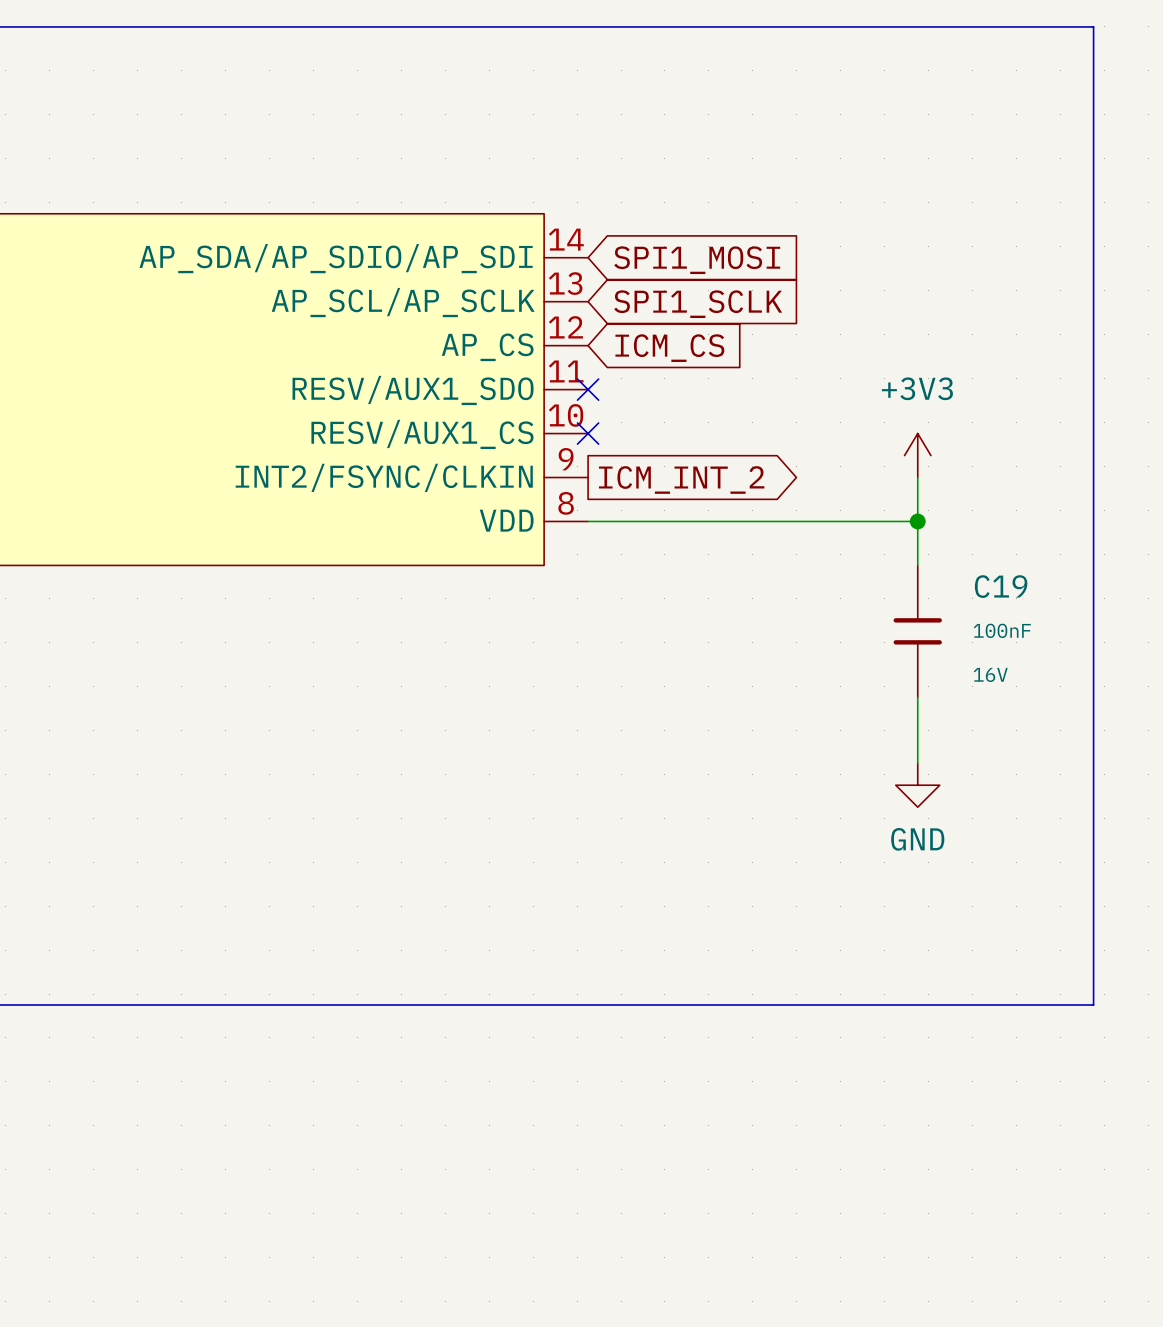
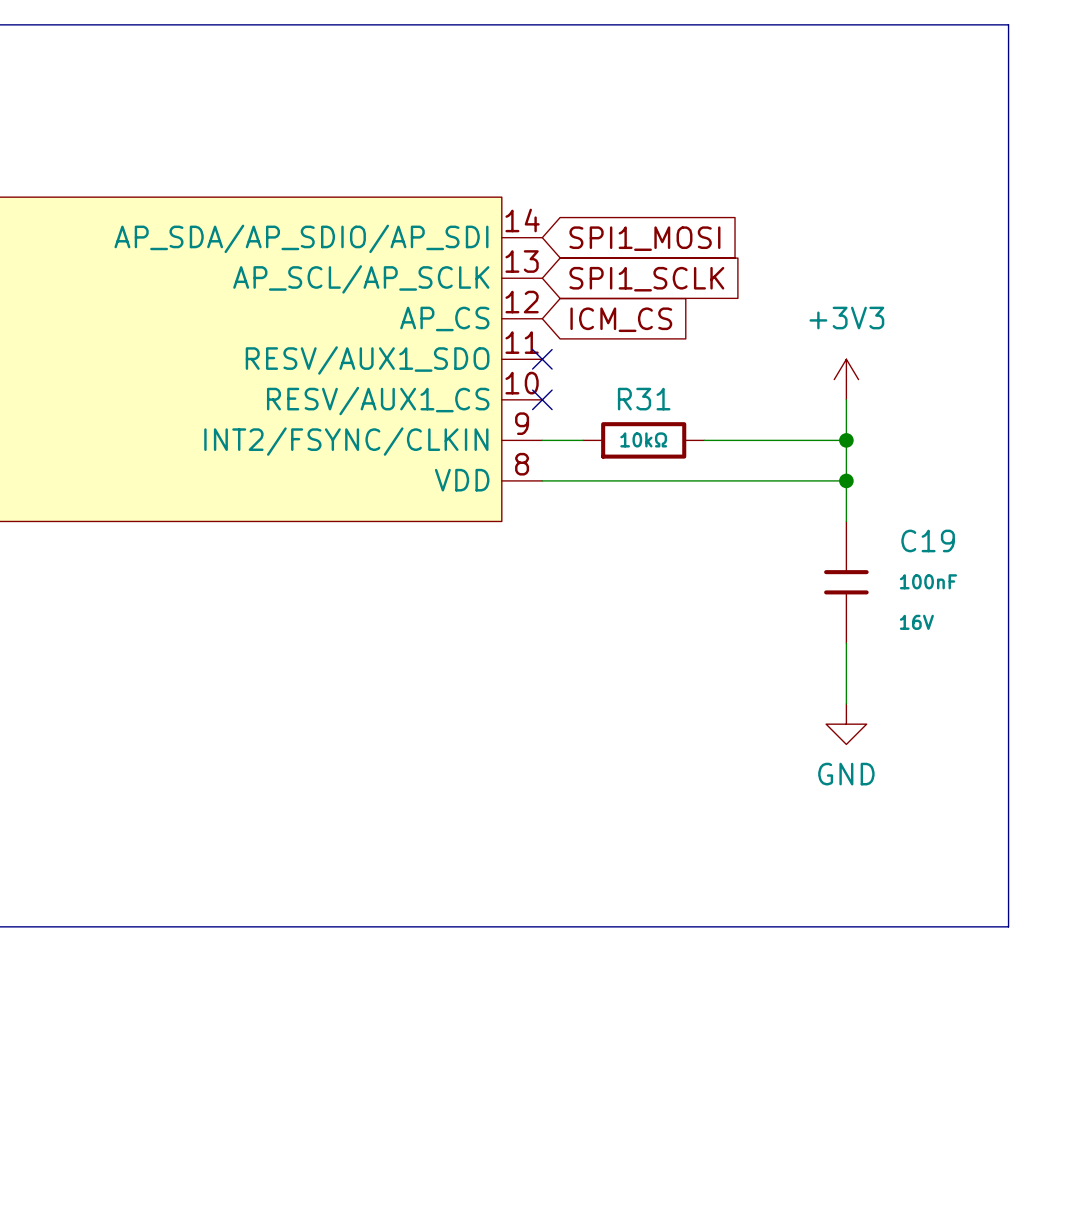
wire: none -> (846, 399) (846, 440) (704, 440)
power symbol position: +3V3 (917, 455) -> +3V3 (846, 379)
wire: none -> (542, 440) (582, 440)
R31: none -> 10kΩ (643, 440)
junction: none -> (846, 440)
global label: ICM_INT_2 (681, 479) -> none

